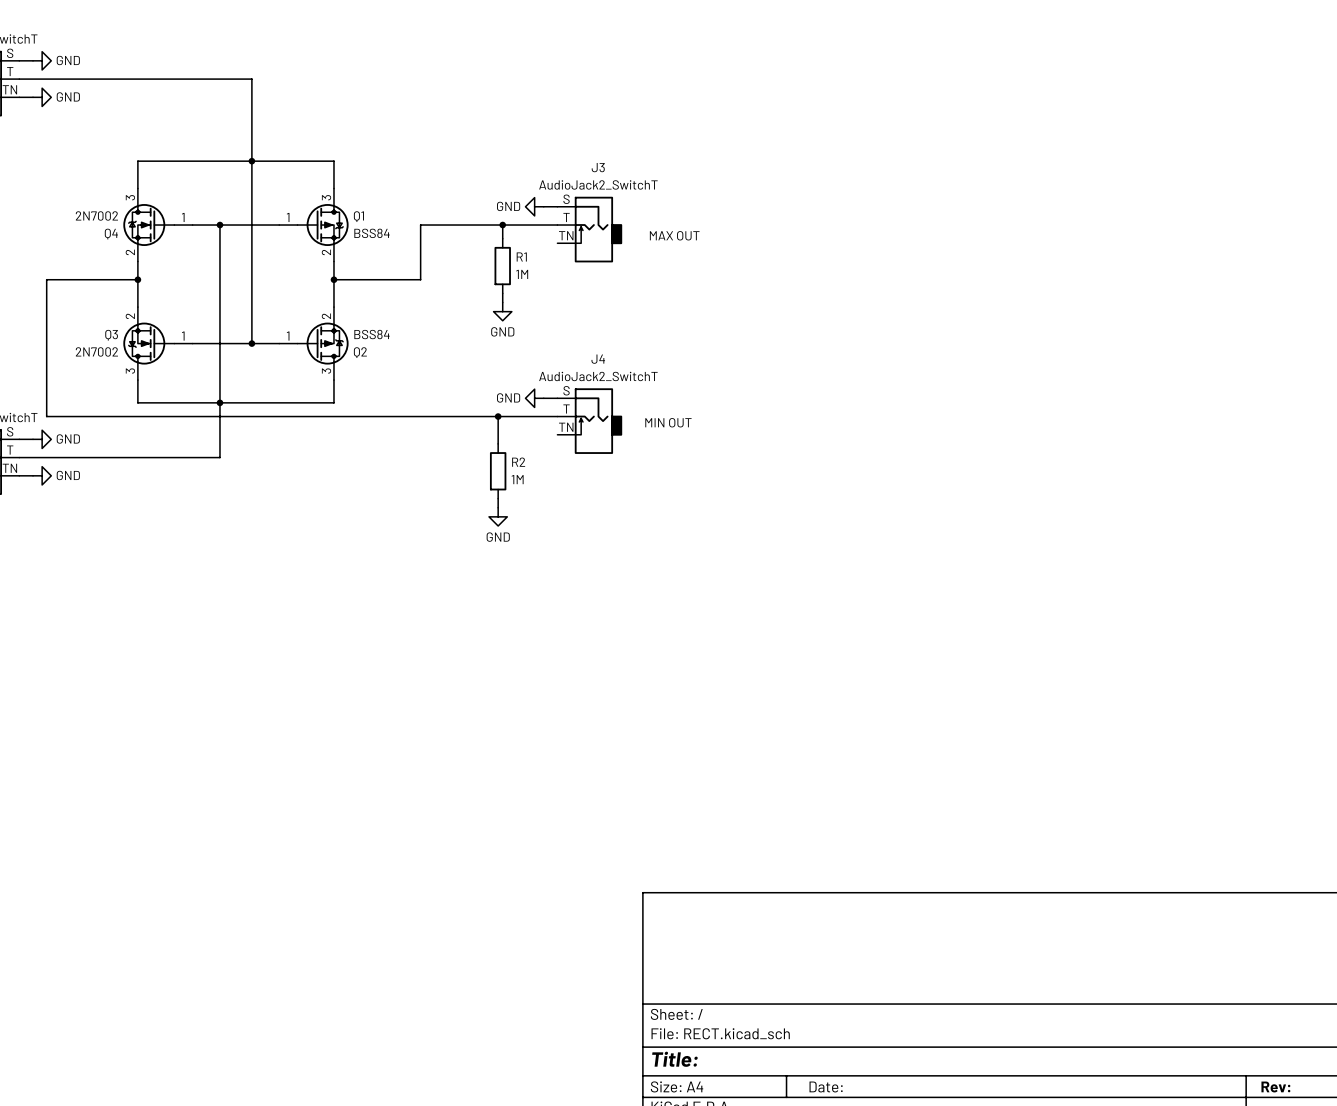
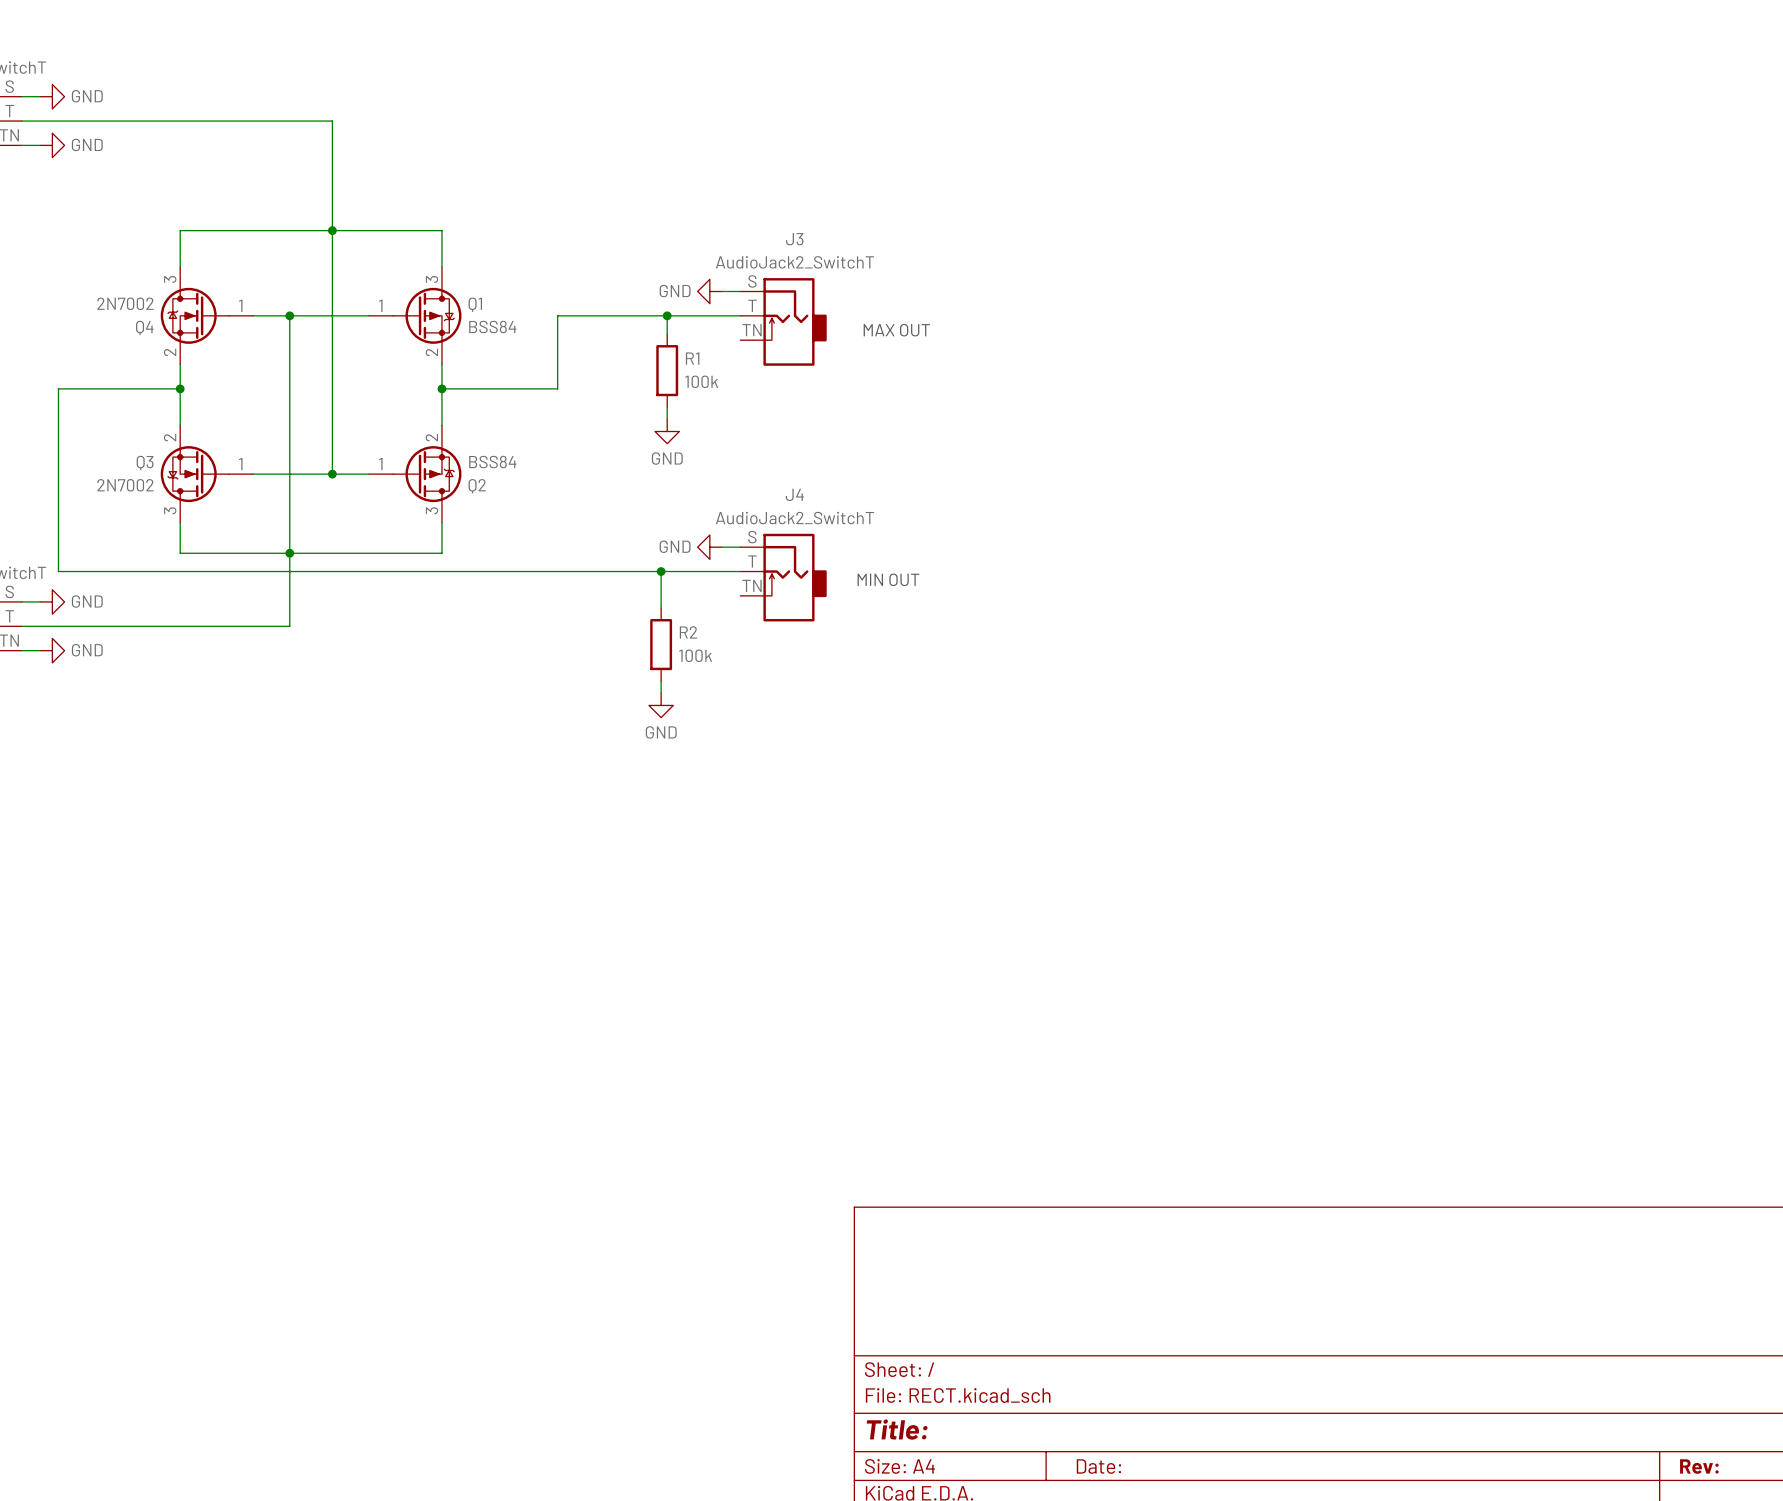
R1 value: 1M (522, 274) -> 100k (701, 381)
R2 value: 1M (517, 479) -> 100k (695, 655)

